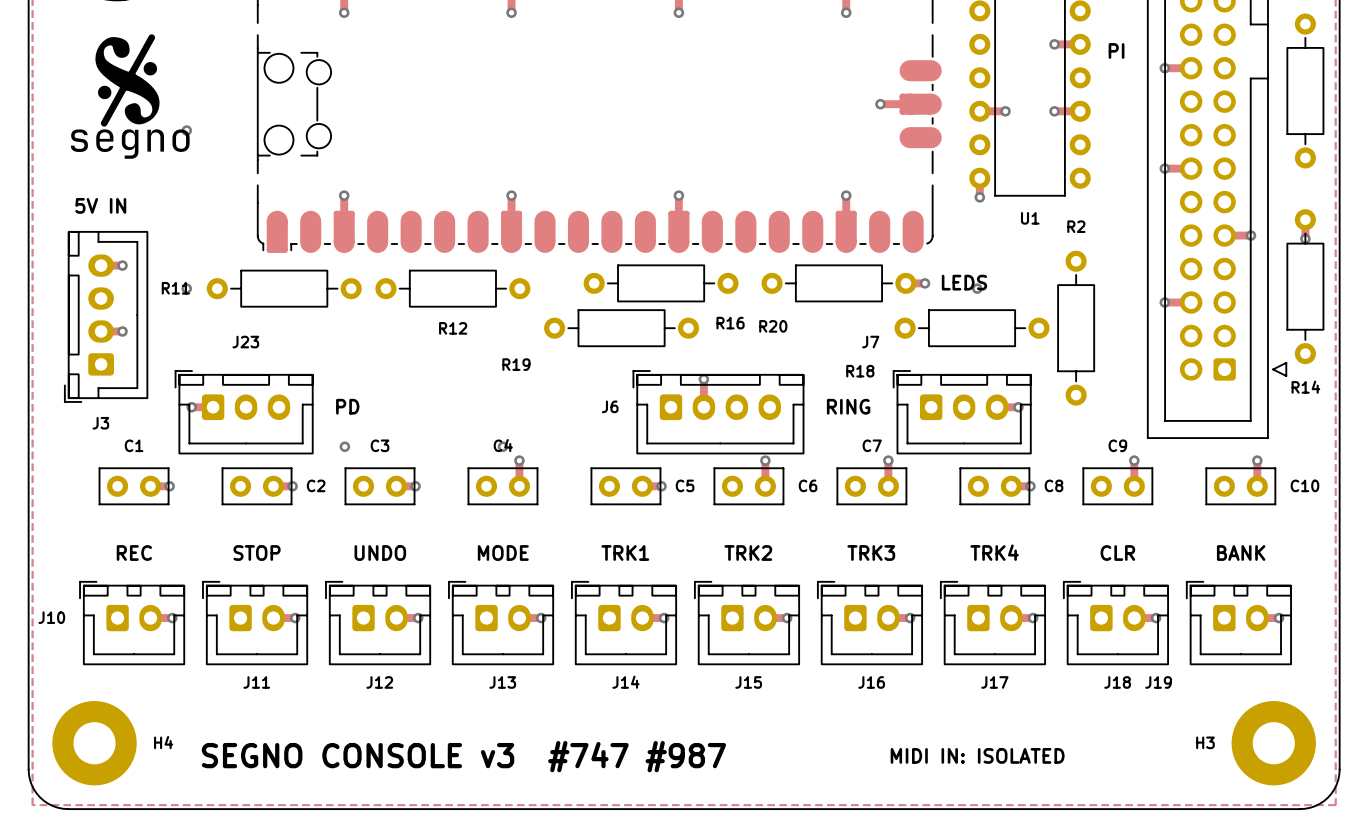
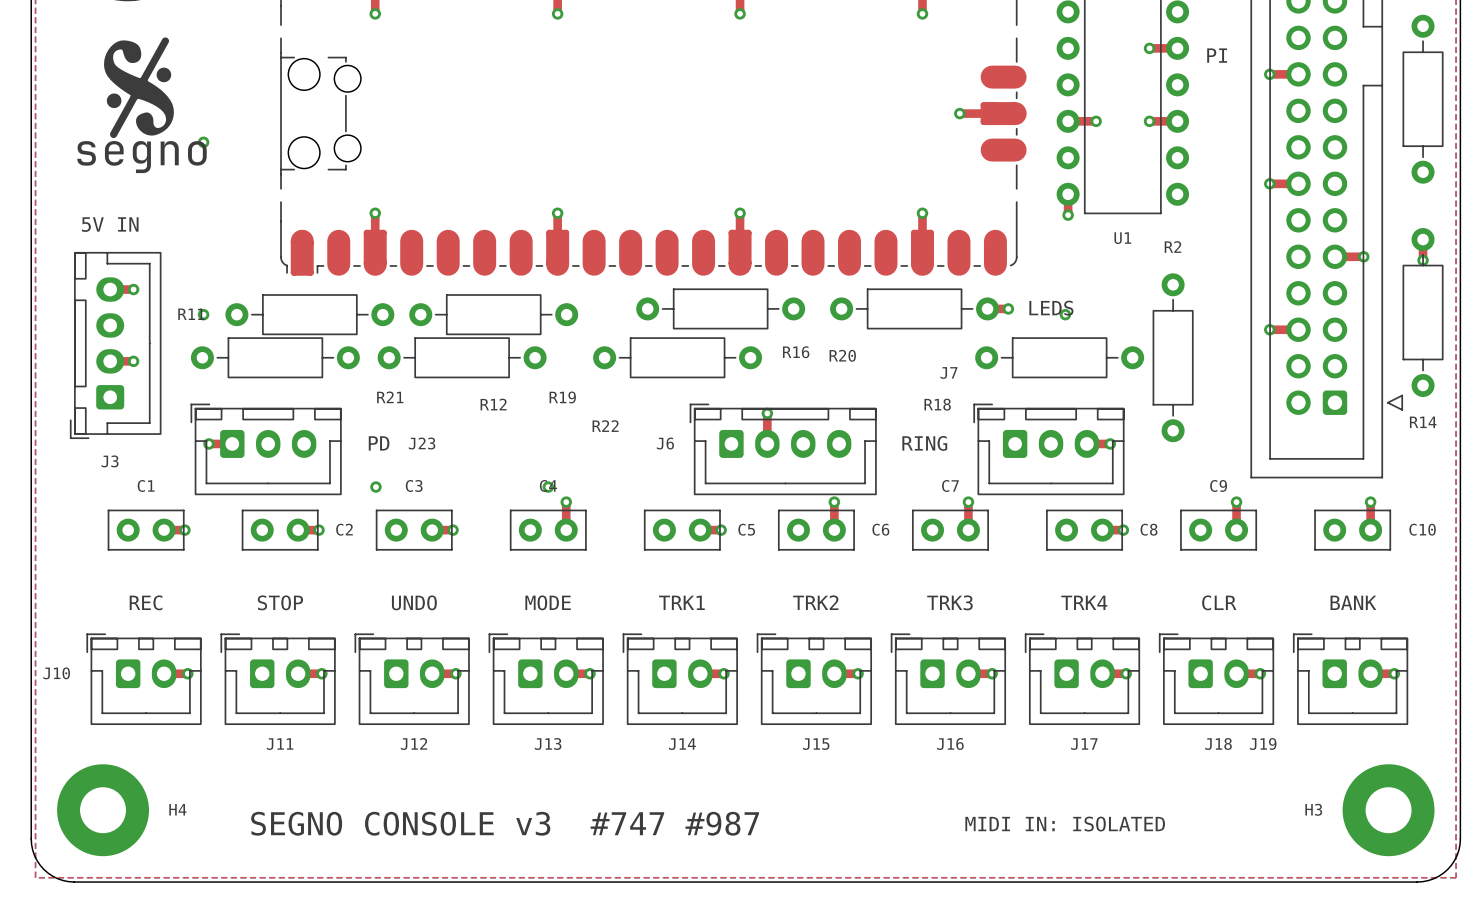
R21: none -> (275, 357)
R22: none -> (462, 357)
R12 name position: R12 (453, 328) -> R12 (493, 404)
J23 name position: J23 (245, 342) -> J23 (422, 443)

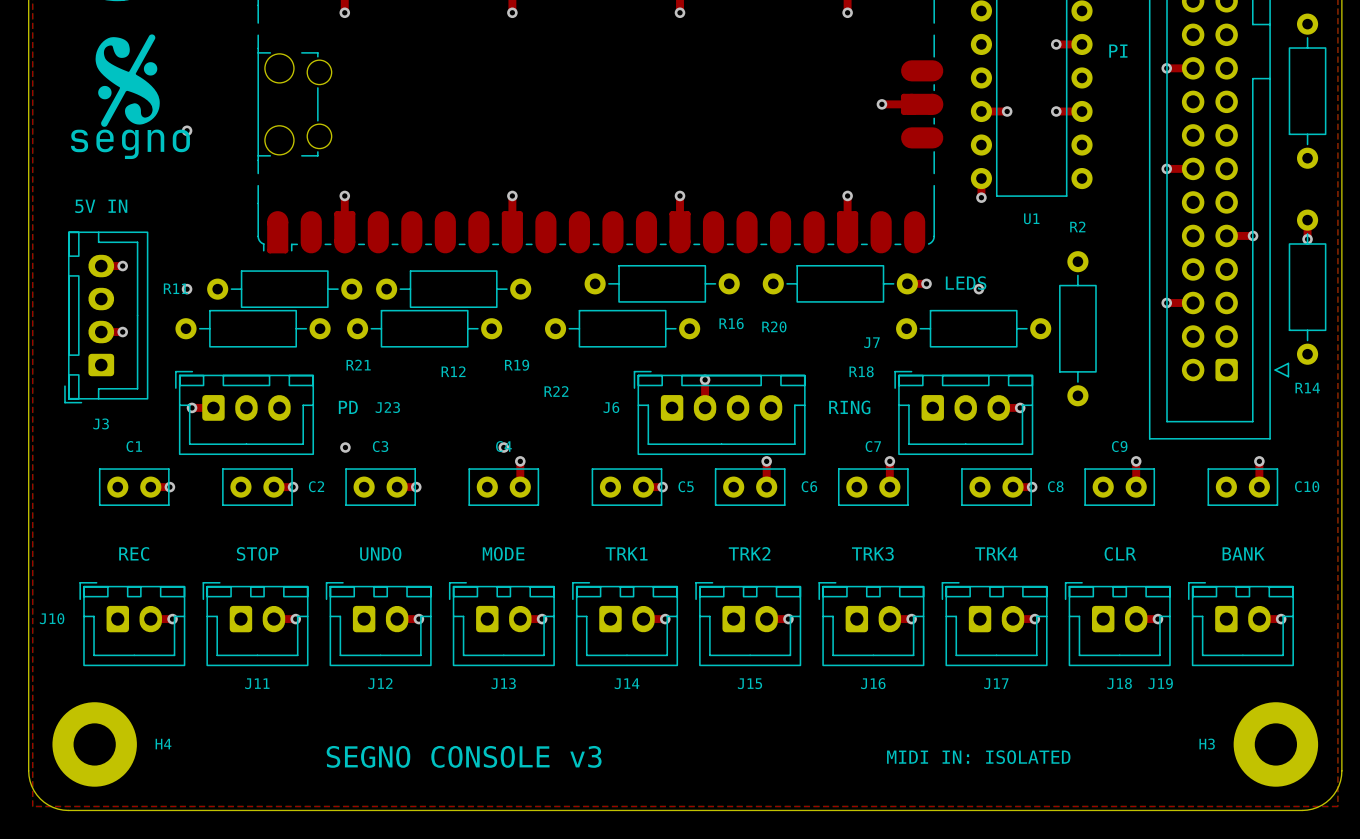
text: SEGNO CONSOLE v3 #747 #987 (505, 823) -> SEGNO CONSOLE v3 (464, 756)

